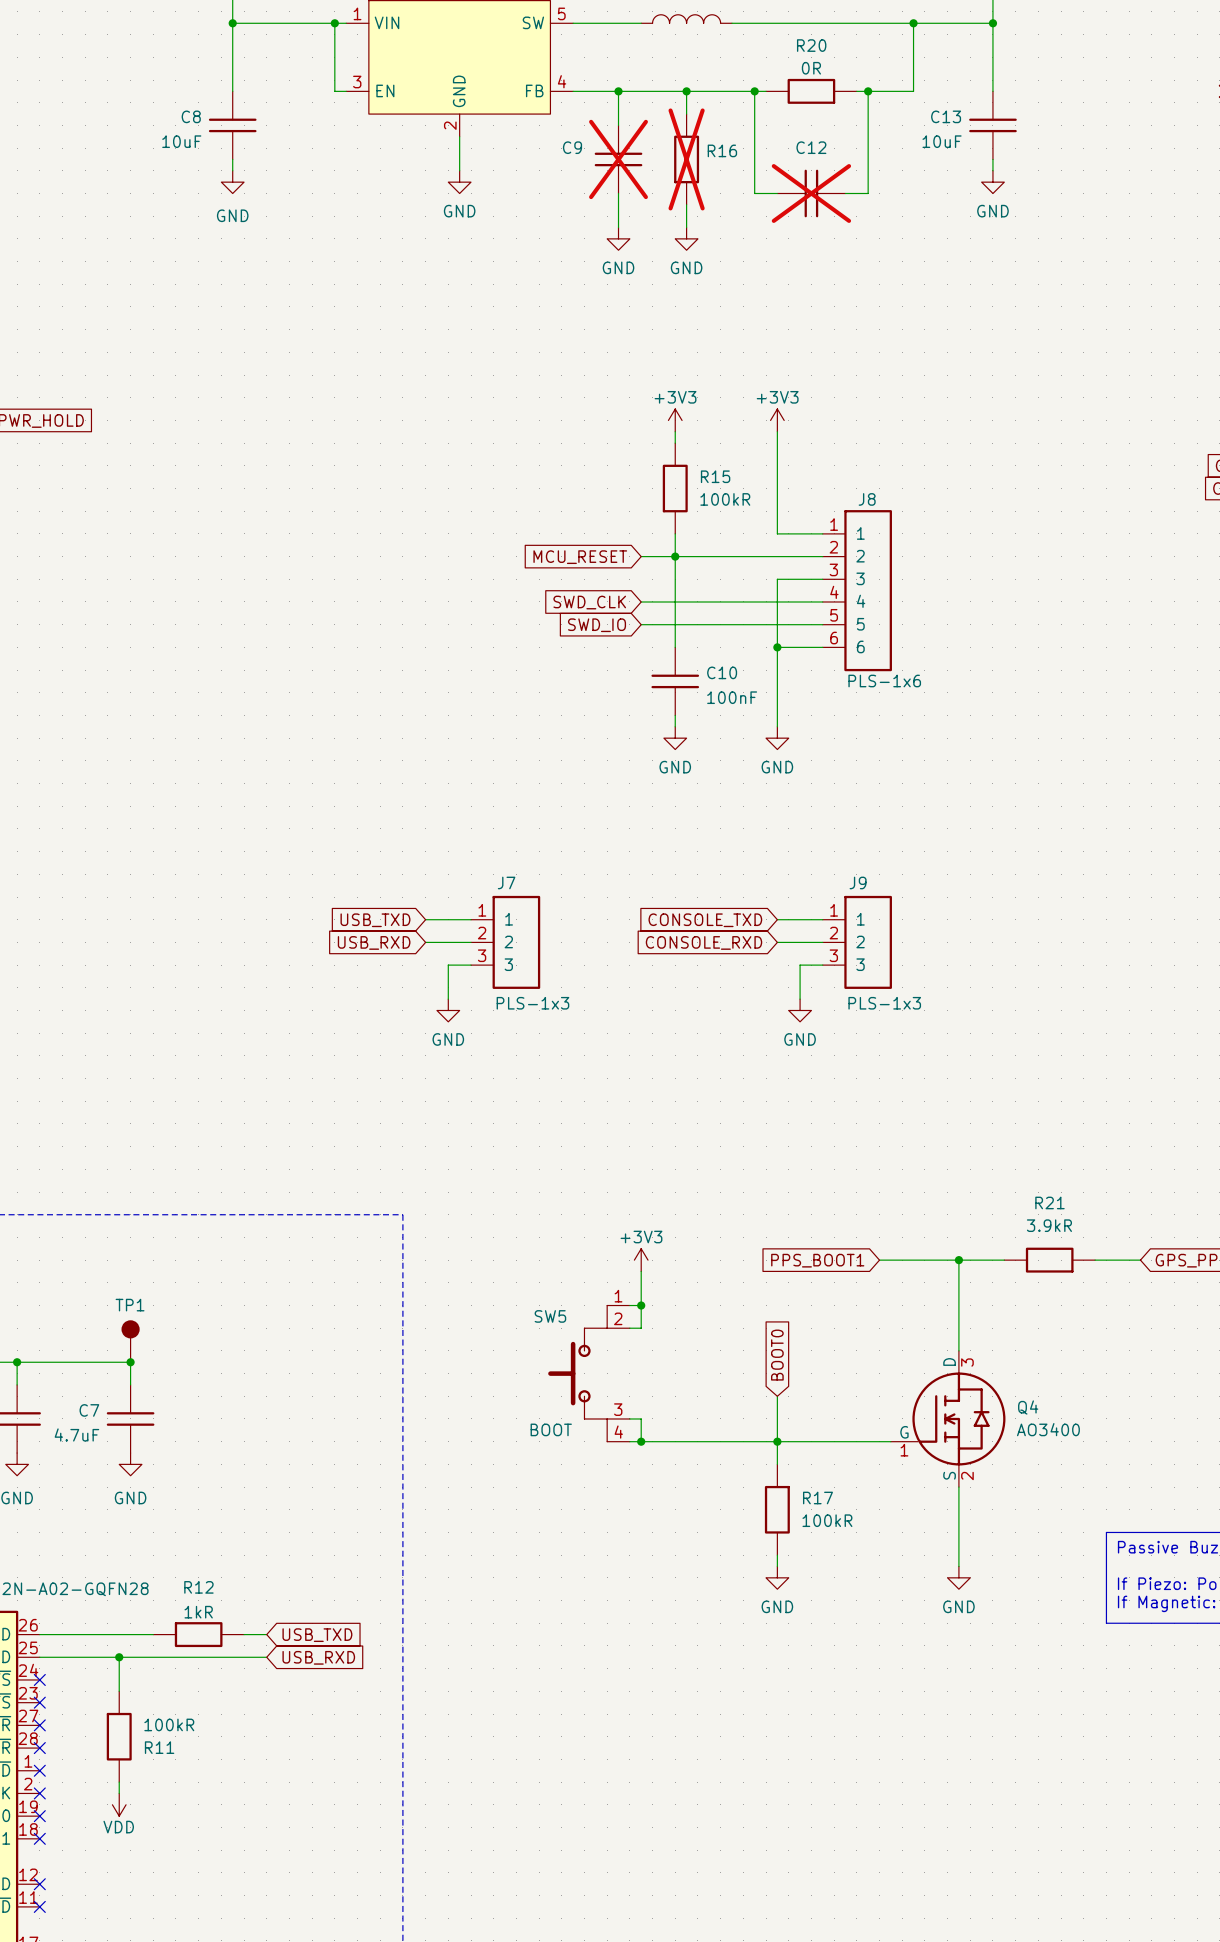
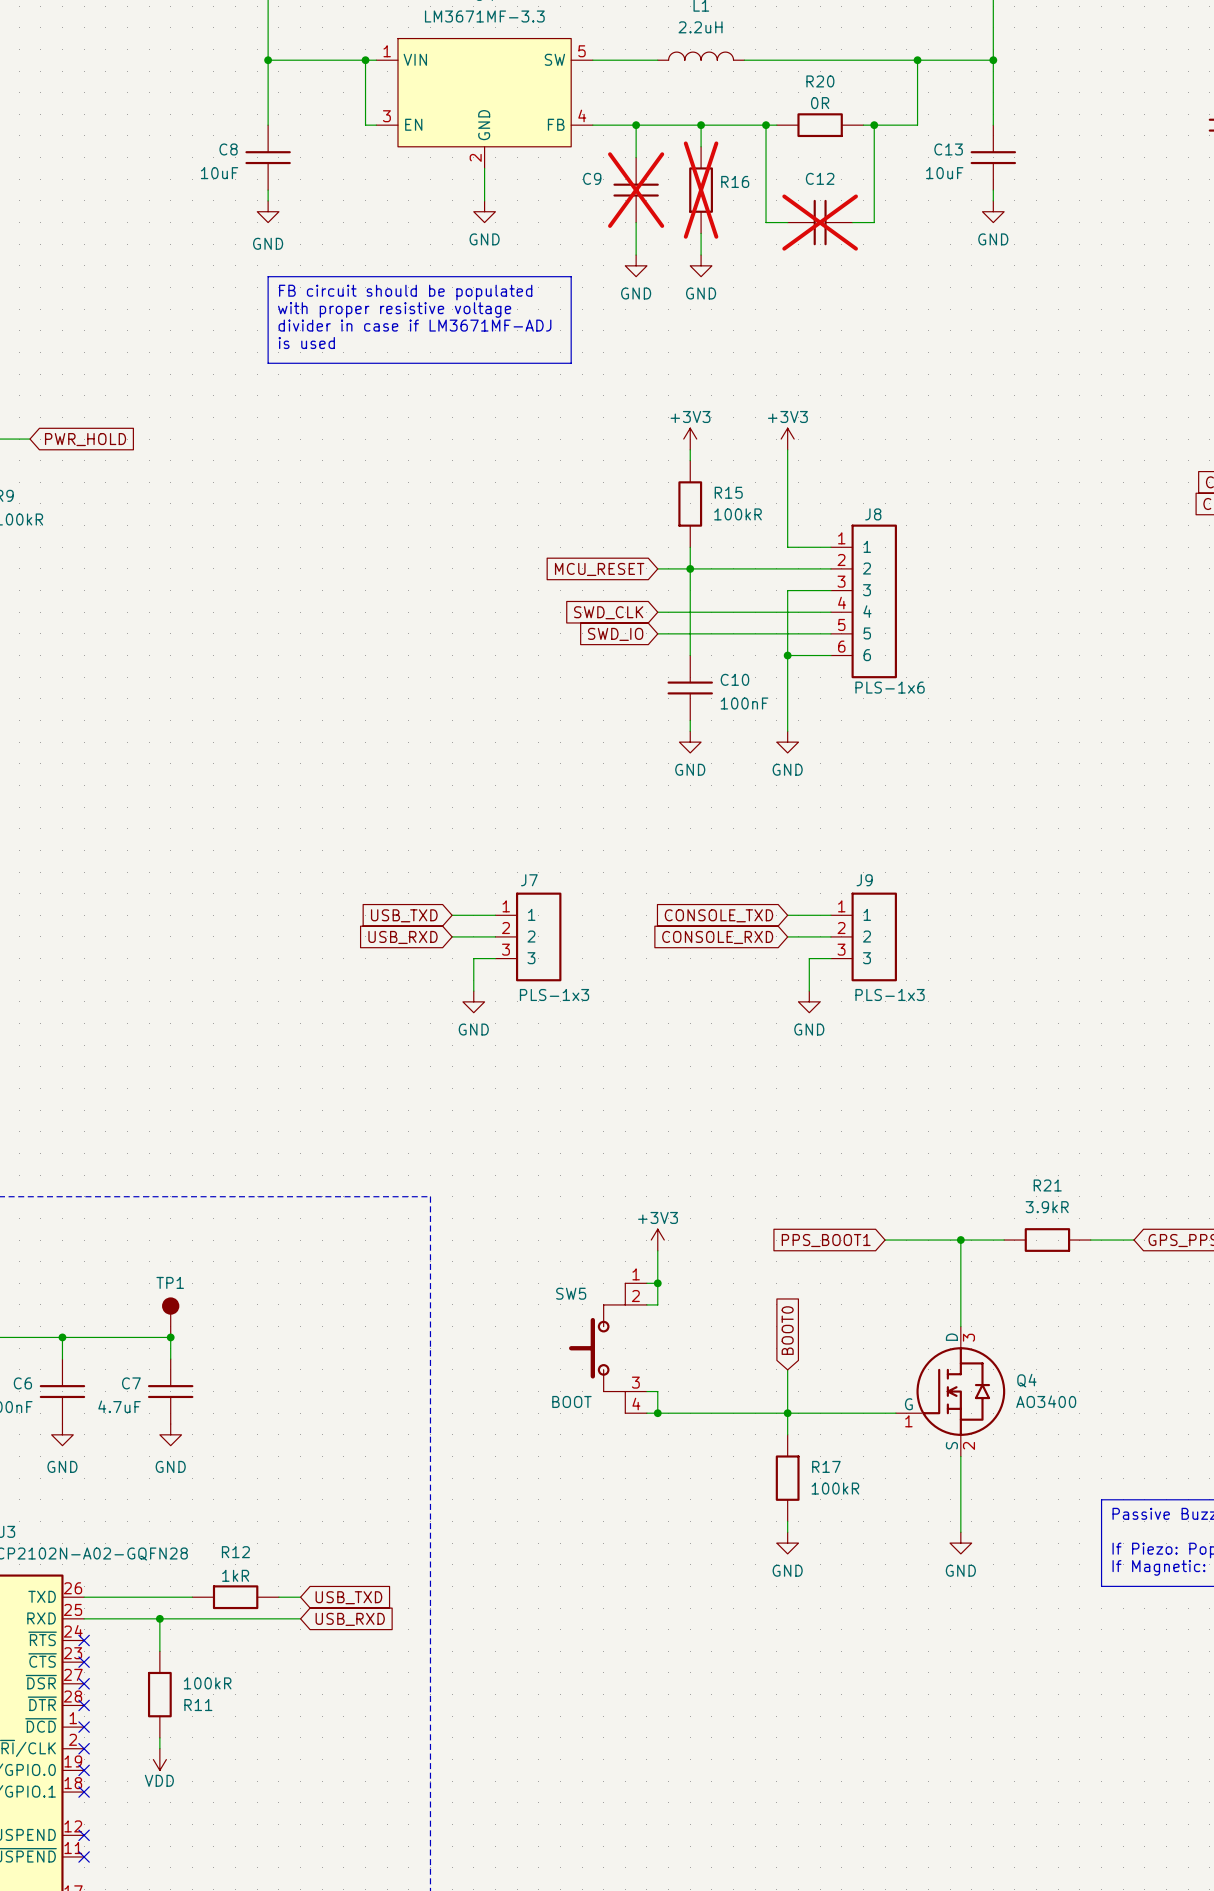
line: none -> (268, 276) (571, 276) (571, 363) (268, 363) (268, 276)
text: none -> FB circuit should be populated (405, 292)
text: none -> with proper resistive voltage (394, 309)
text: none -> divider in case if LM3671MF-ADJ (414, 325)
text: none -> is used (306, 343)

